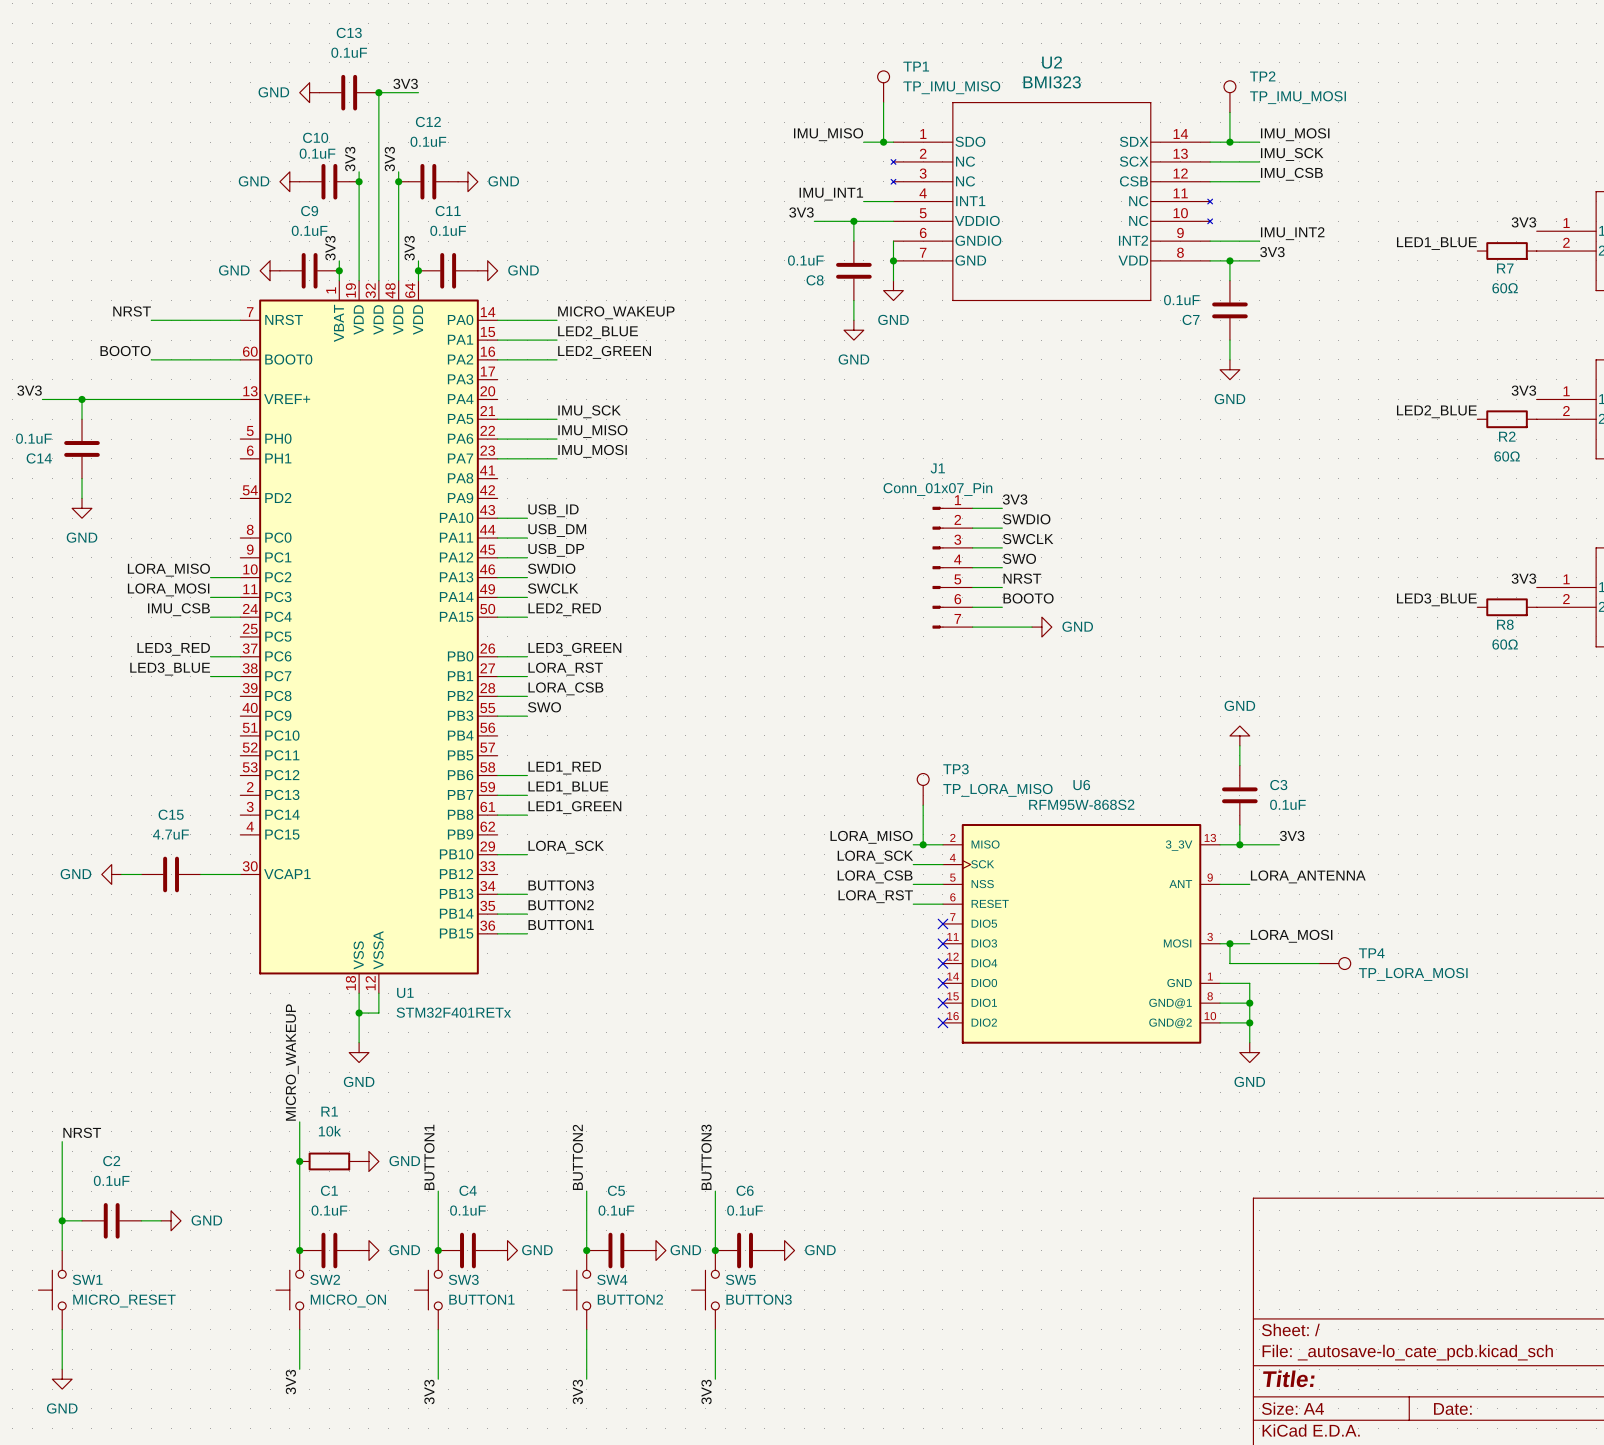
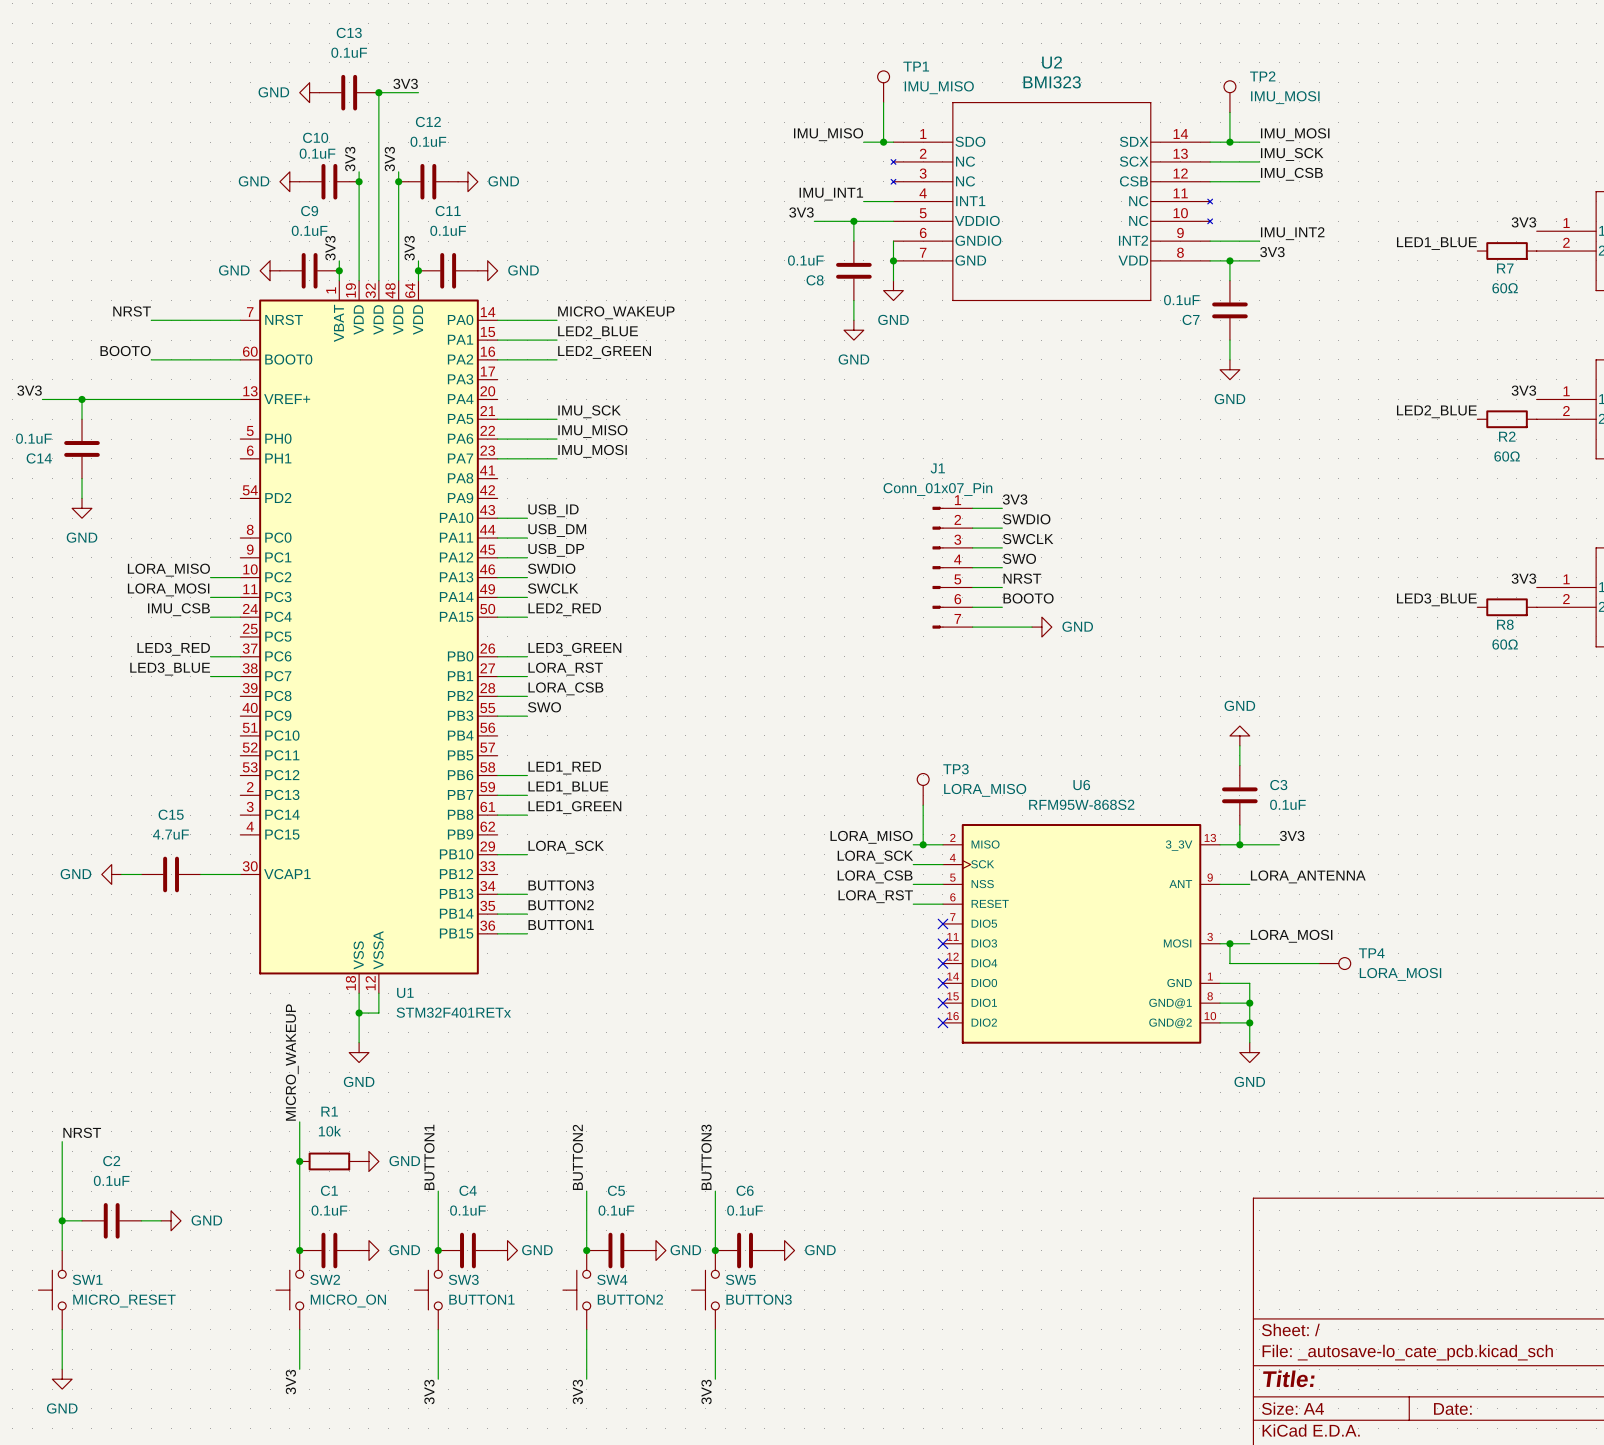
TP1 value: TP_IMU_MISO (951, 87) -> IMU_MISO (939, 87)
TP2 value: TP_IMU_MOSI (1298, 97) -> IMU_MOSI (1285, 97)
TP3 value: TP_LORA_MISO (997, 790) -> LORA_MISO (985, 790)
TP4 value: TP_LORA_MOSI (1413, 974) -> LORA_MOSI (1400, 974)

